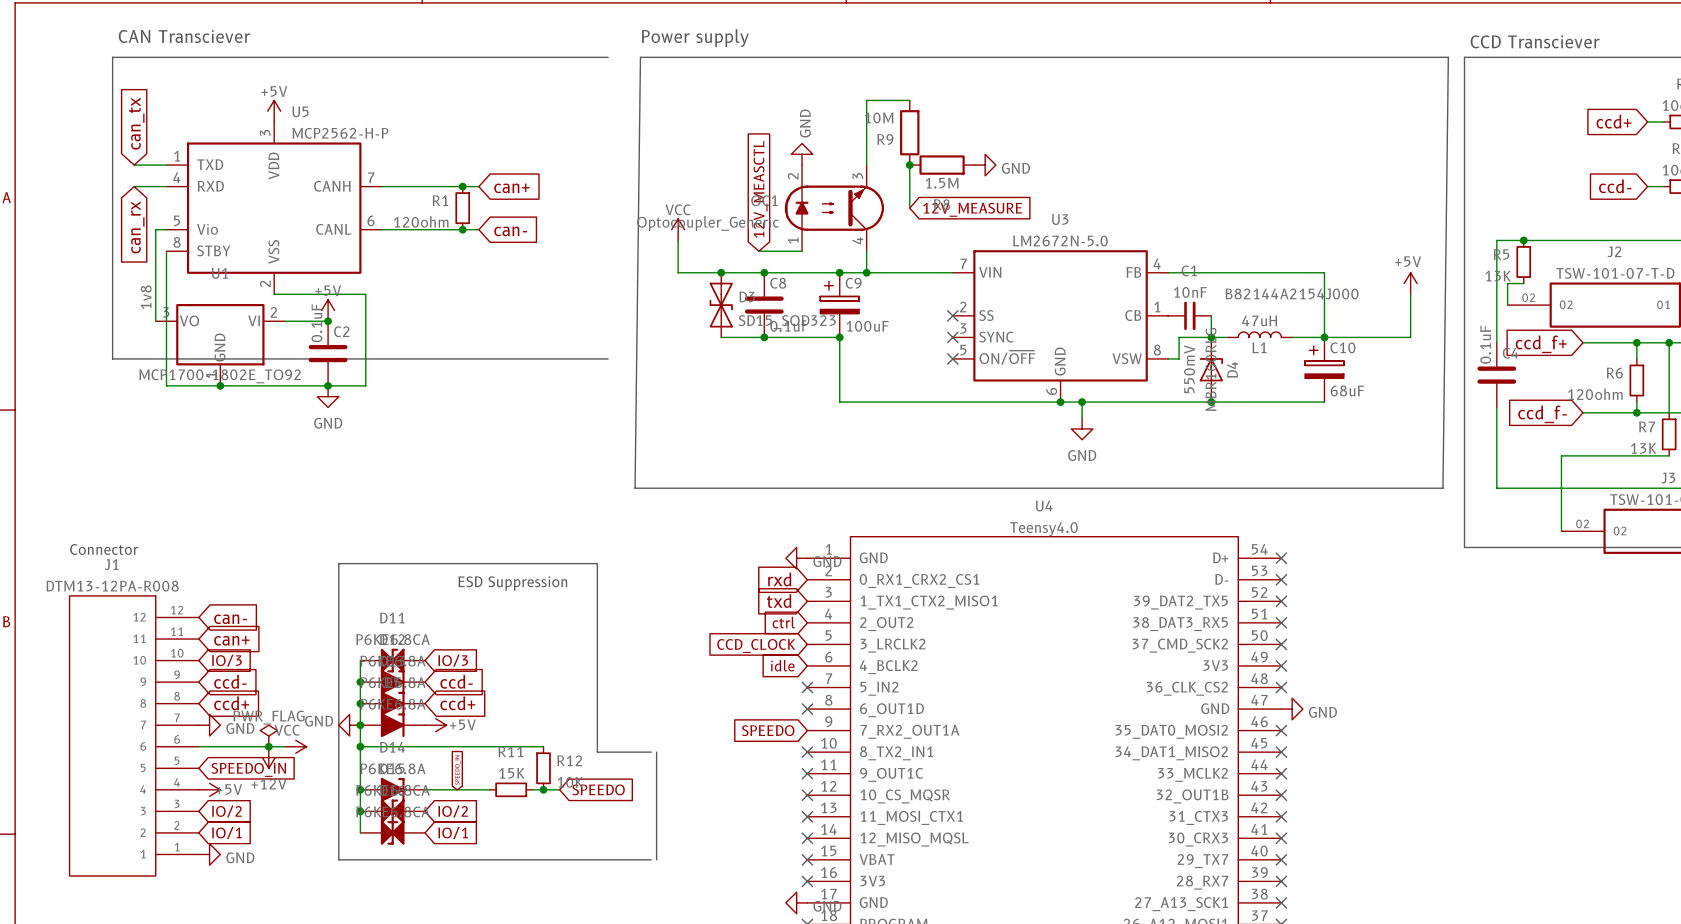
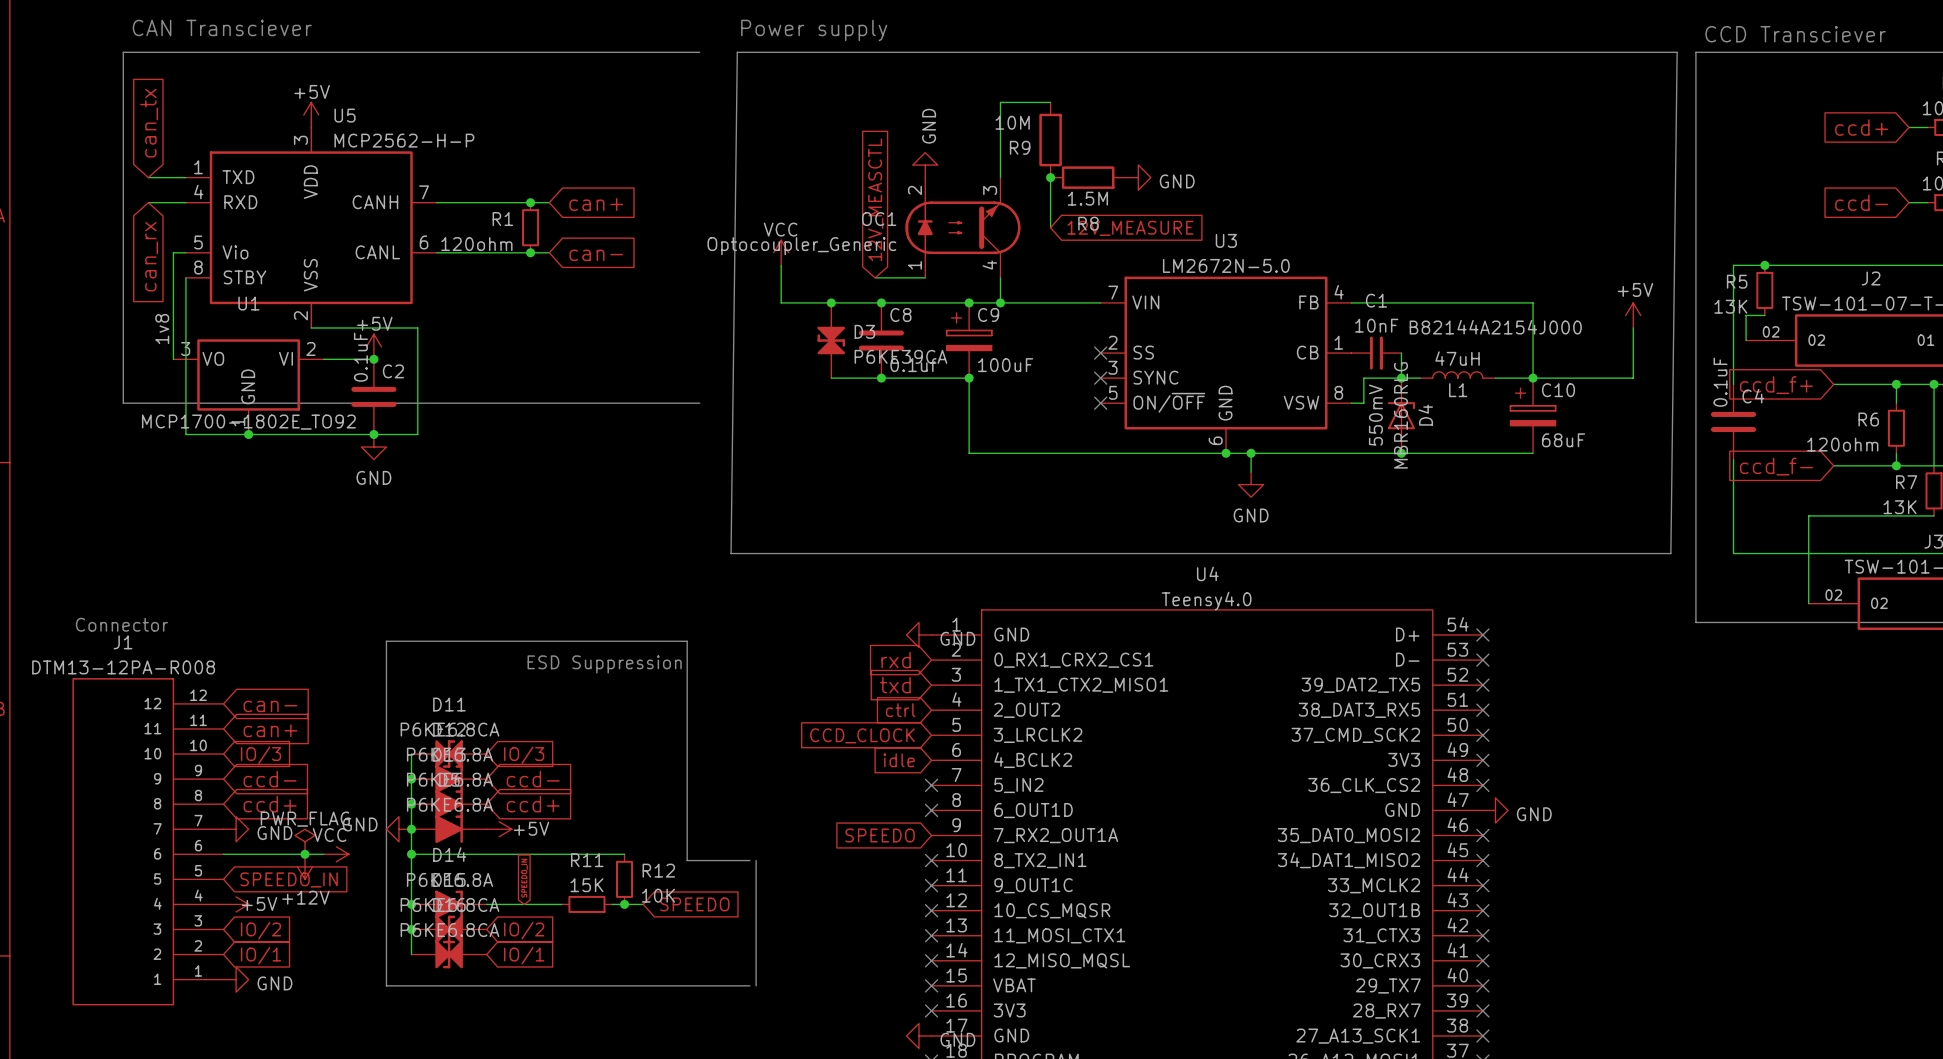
D3 symbol: [709, 272, 733, 338] -> [817, 302, 846, 379]
D3 value: SD15_SOD323 (787, 322) -> P6KE39CA (900, 356)

